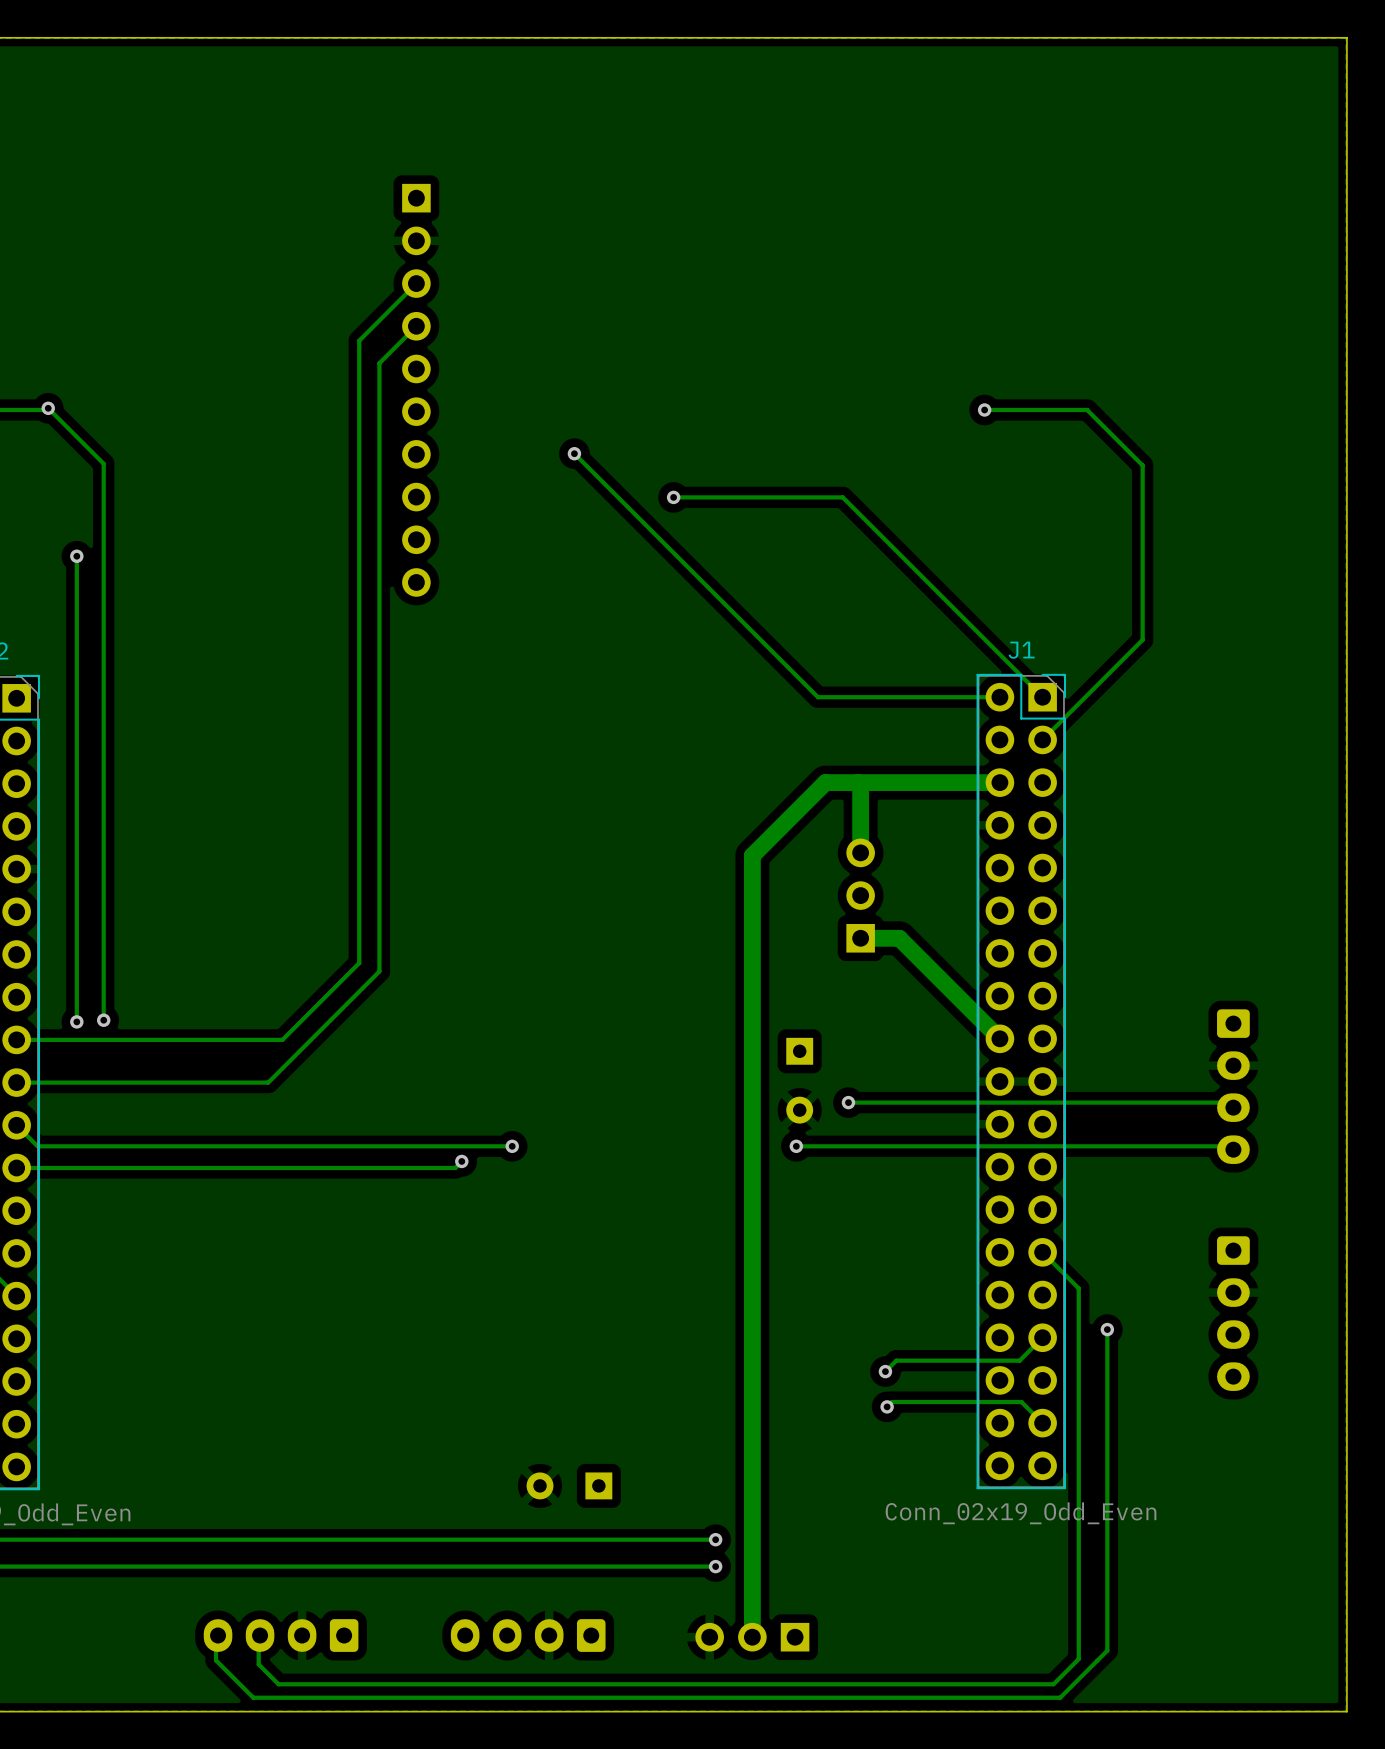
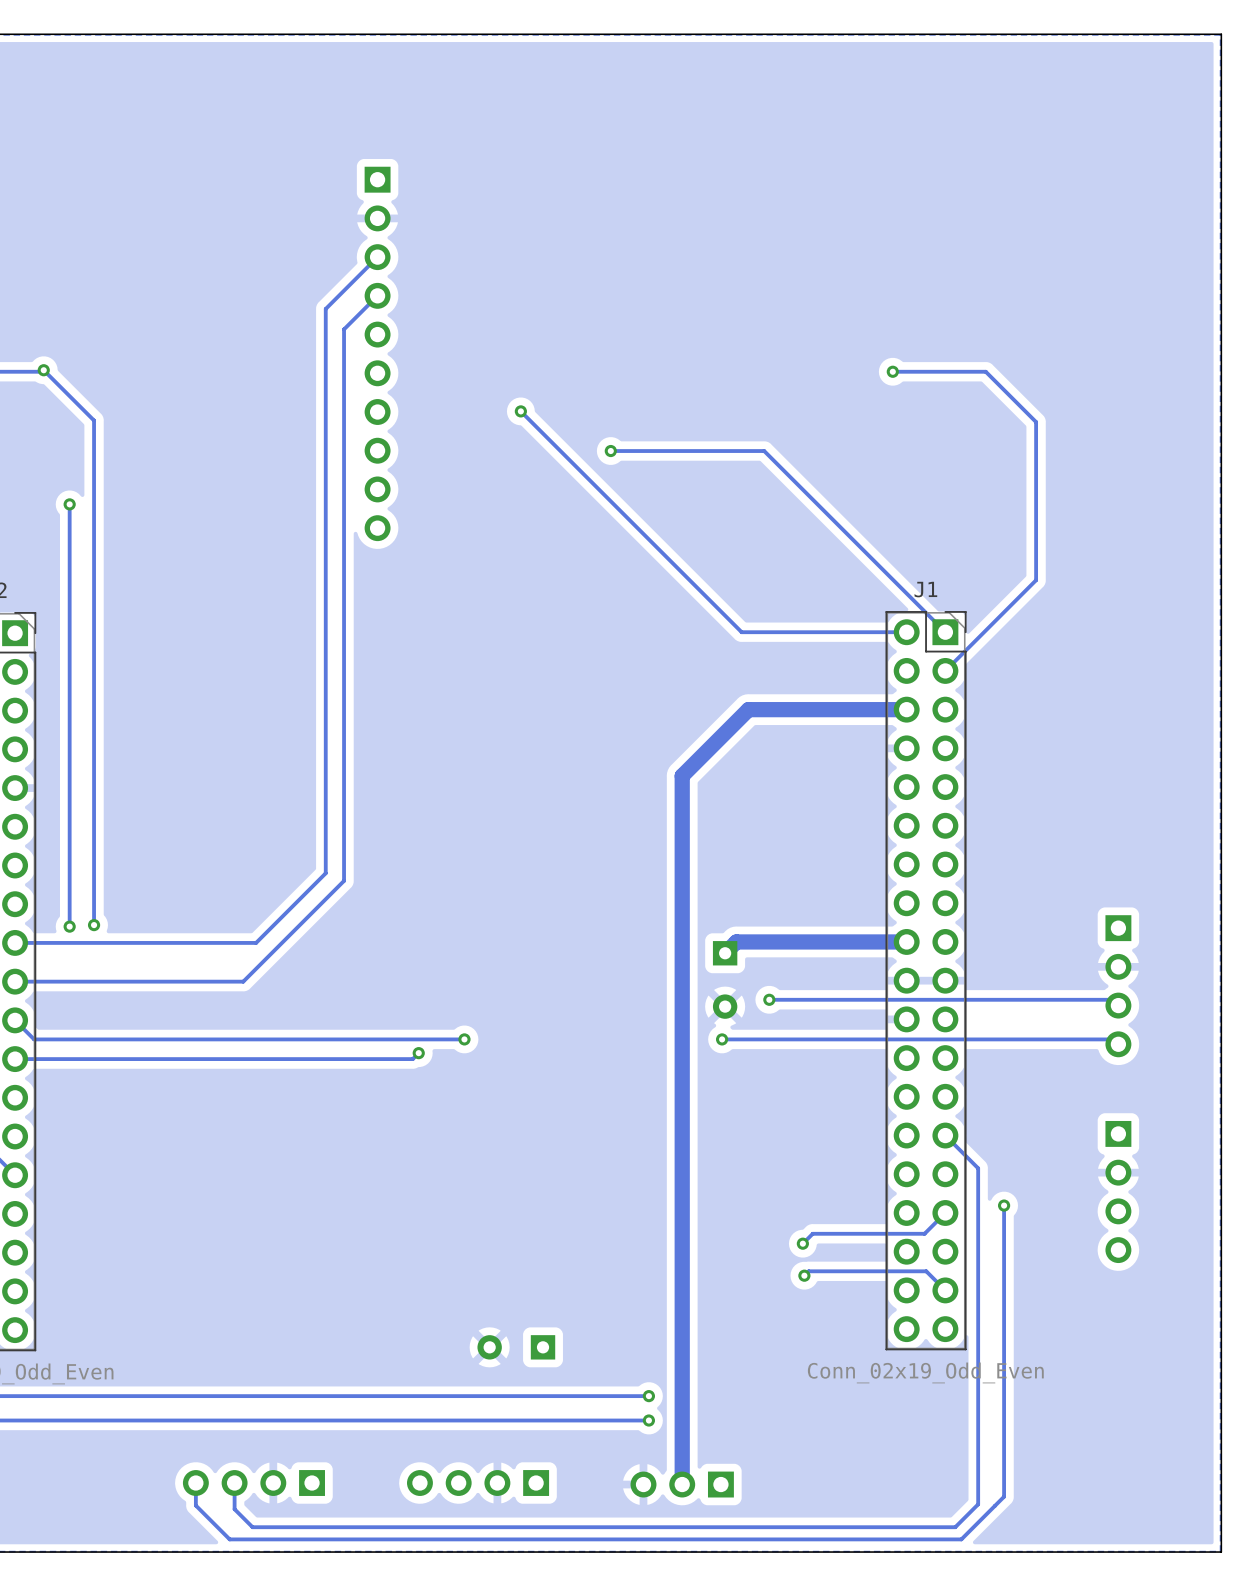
track: (857, 782) (860, 785) (860, 852) -> none
part: (860, 895) -> none
track: (860, 938) (899, 938) (999, 1038) -> (725, 953) (736, 941) (906, 941)
part footprint: [1217, 1009, 1250, 1164] -> [1105, 915, 1132, 1058]
part footprint: [1217, 1236, 1250, 1391] -> [1105, 1120, 1132, 1264]
part footprint: [203, 1619, 359, 1652] -> [182, 1470, 325, 1496]
part footprint: [450, 1619, 606, 1652] -> [407, 1470, 550, 1496]

